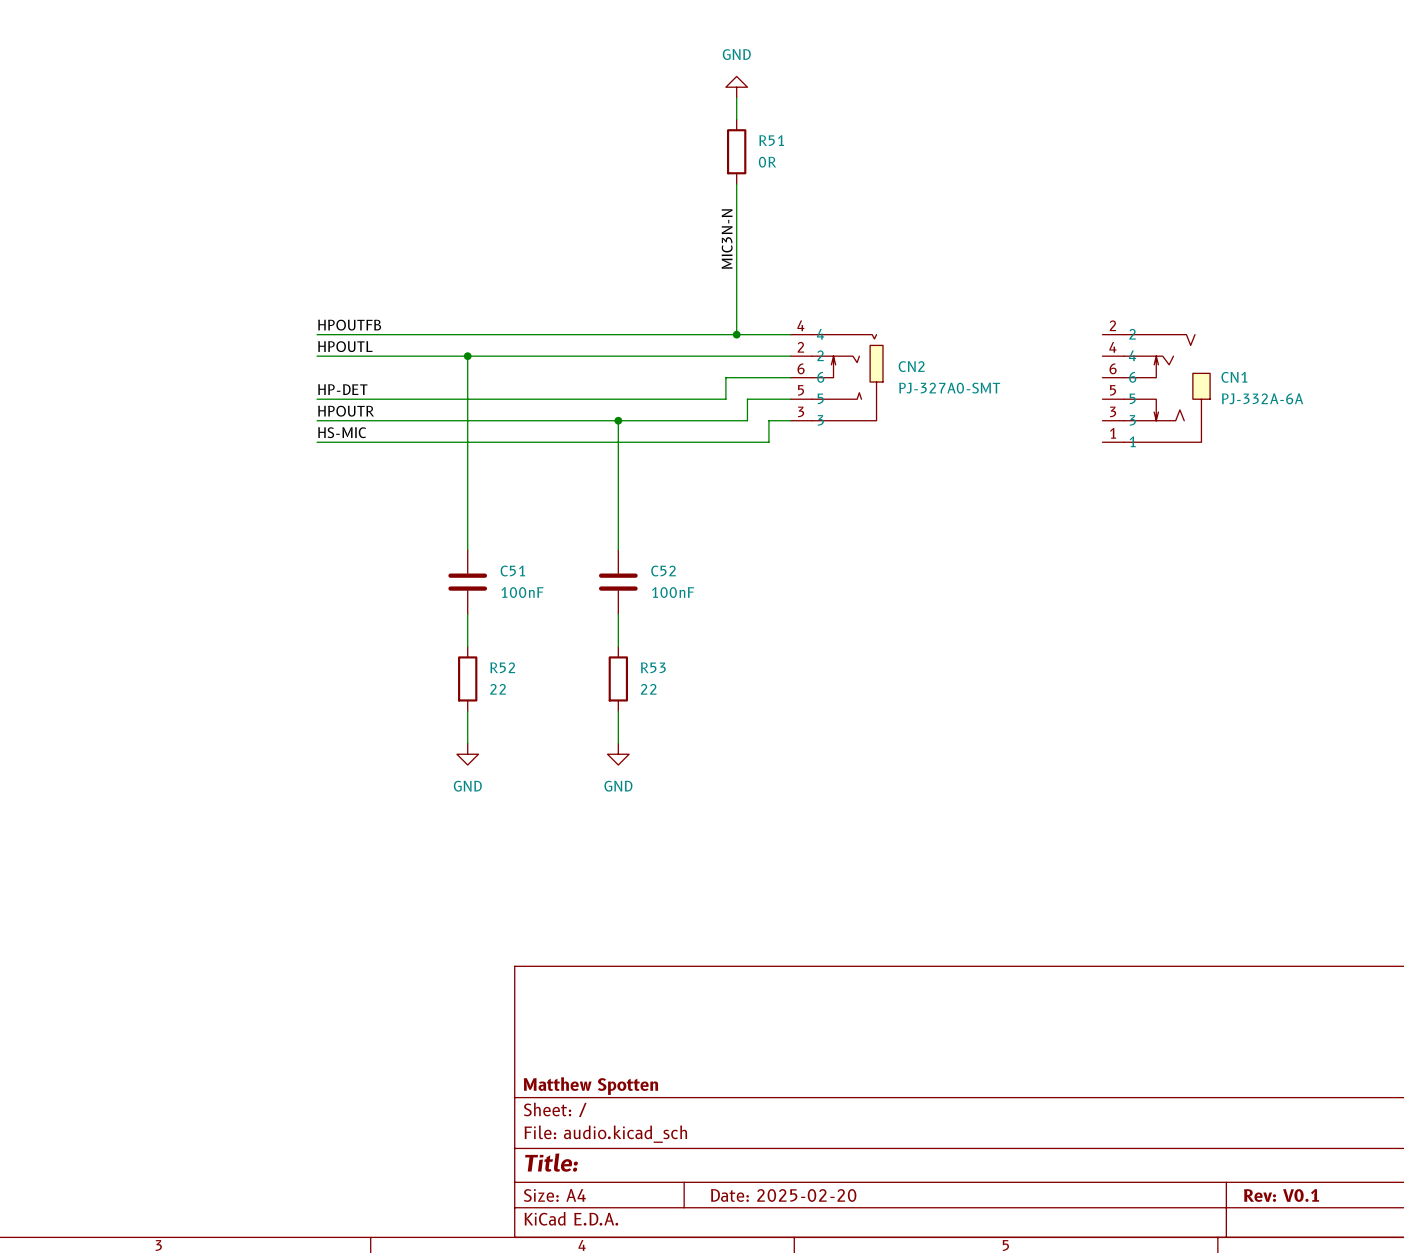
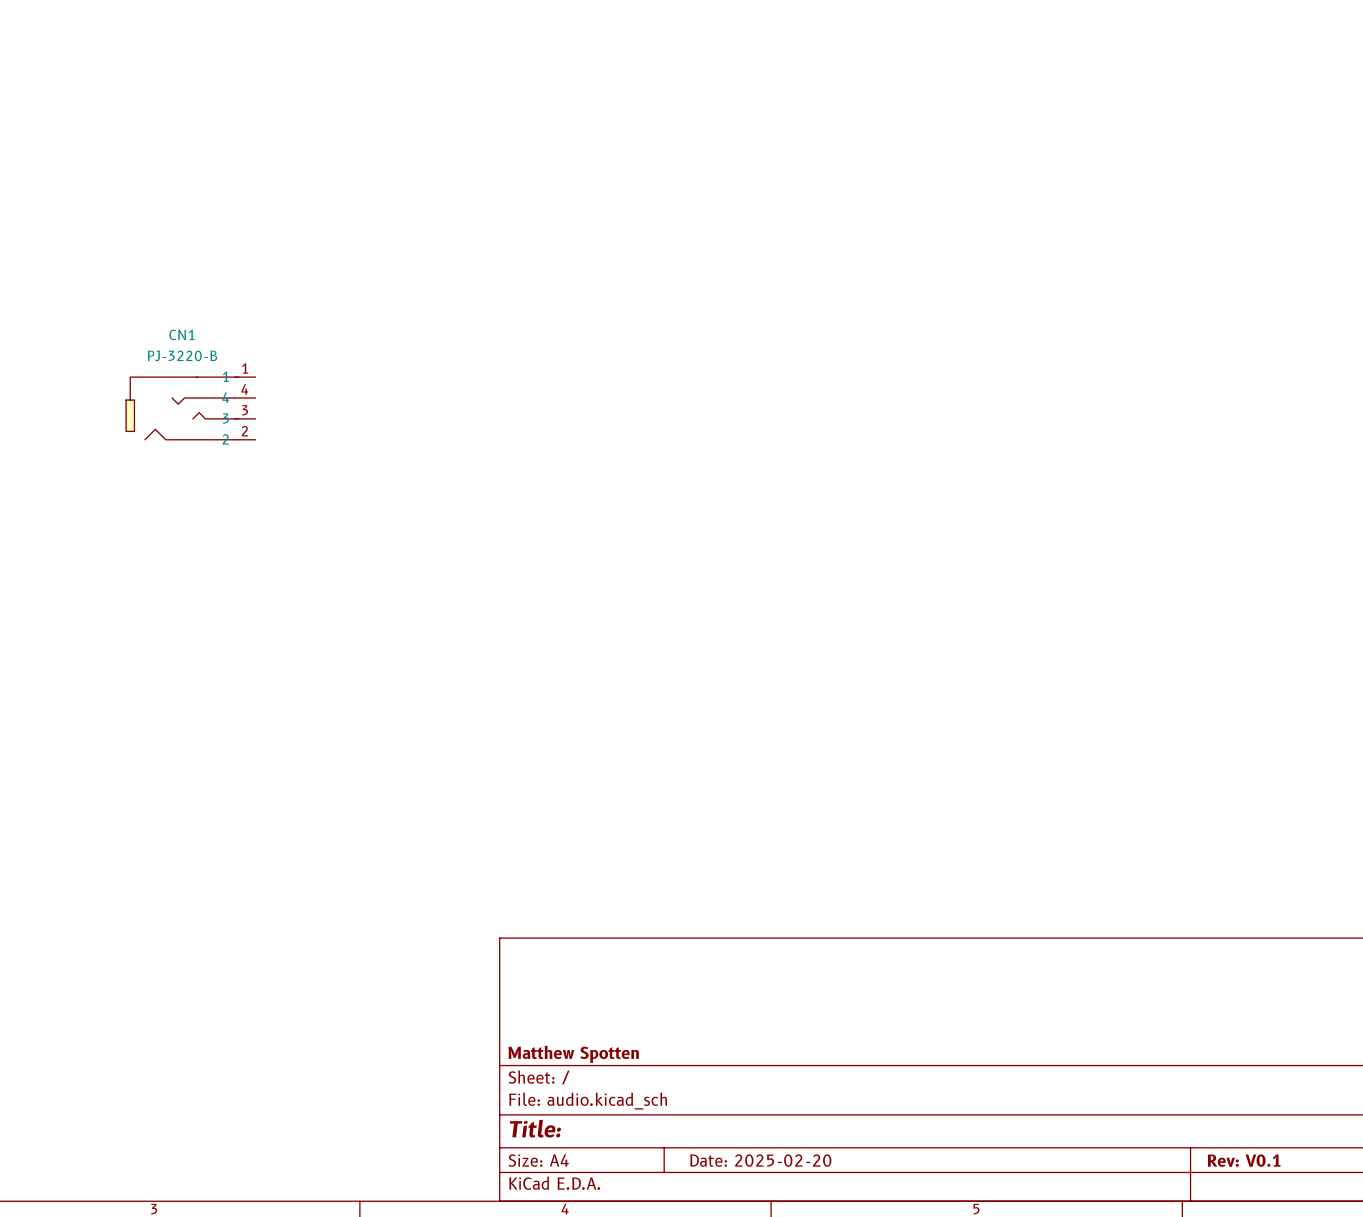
power symbol: GND (736, 87) -> none
wire: (736, 97) (736, 119) -> none
R51: 0R (736, 151) -> none
wire: (736, 184) (736, 334) -> none
label: MIC3N-N (727, 239) -> none
label: HPOUTFB (349, 325) -> none
wire: (317, 334) (790, 334) -> none
junction: (736, 334) -> none
CN1 symbol: [1102, 334, 1211, 443] -> [126, 377, 256, 440]
label: HPOUTL (345, 346) -> none
wire: (317, 356) (790, 356) -> none
wire: (467, 356) (467, 549) -> none
junction: (467, 356) -> none
wire: (790, 377) (725, 377) (725, 399) (317, 399) -> none
CN2: PJ-327A0-SMT (836, 377) -> none
CN1 name position: CN1 (1234, 377) -> CN1 (181, 334)
label: HP-DET (342, 389) -> none
CN1 value: PJ-332A-6A (1262, 398) -> PJ-3220-B (182, 355)
wire: (790, 399) (747, 399) (747, 420) (317, 420) -> none
label: HPOUTR (346, 411) -> none
wire: (618, 420) (618, 549) -> none
junction: (618, 420) -> none
wire: (790, 420) (768, 420) (768, 442) (317, 442) -> none
label: HS-MIC (342, 432) -> none
C51: 100nF (467, 582) -> none
C52: 100nF (618, 582) -> none
wire: (467, 614) (467, 646) -> none
wire: (618, 614) (618, 646) -> none
R52: 22 (467, 678) -> none
R53: 22 (618, 678) -> none
wire: (467, 711) (467, 743) -> none
wire: (618, 711) (618, 743) -> none
power symbol: GND (467, 754) -> none
power symbol: GND (618, 754) -> none

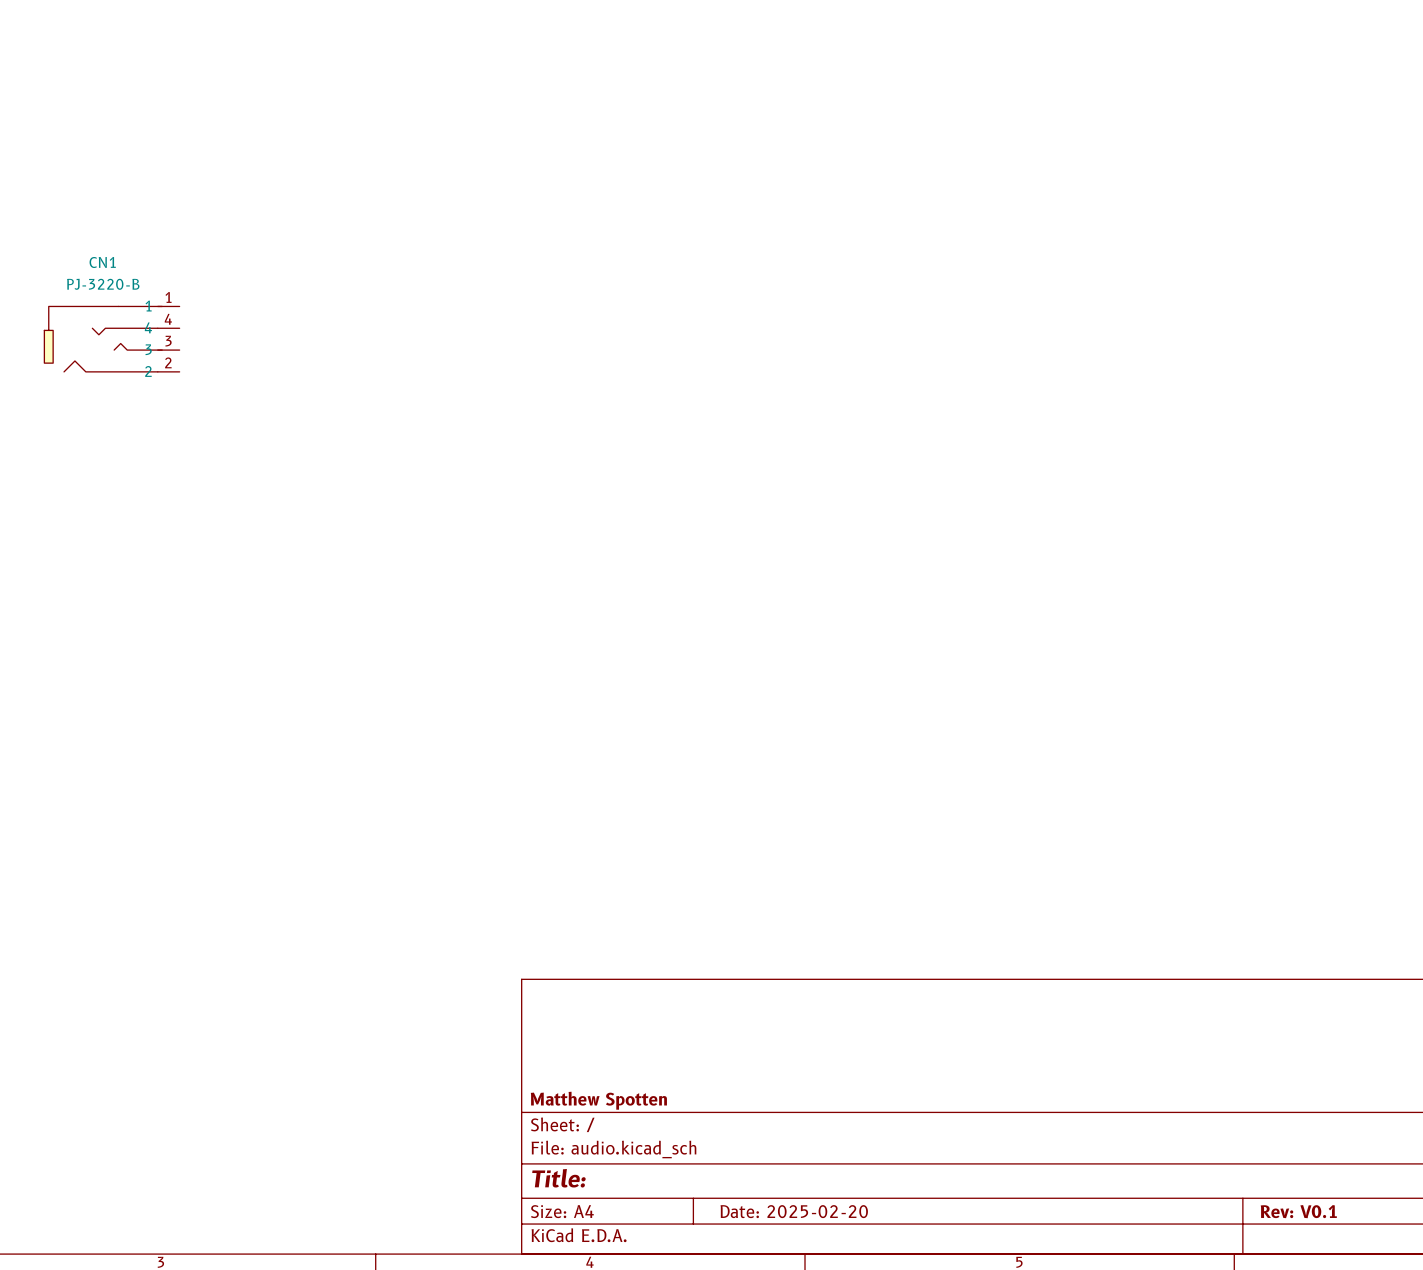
CN1 position: (190, 408) -> (111, 339)

